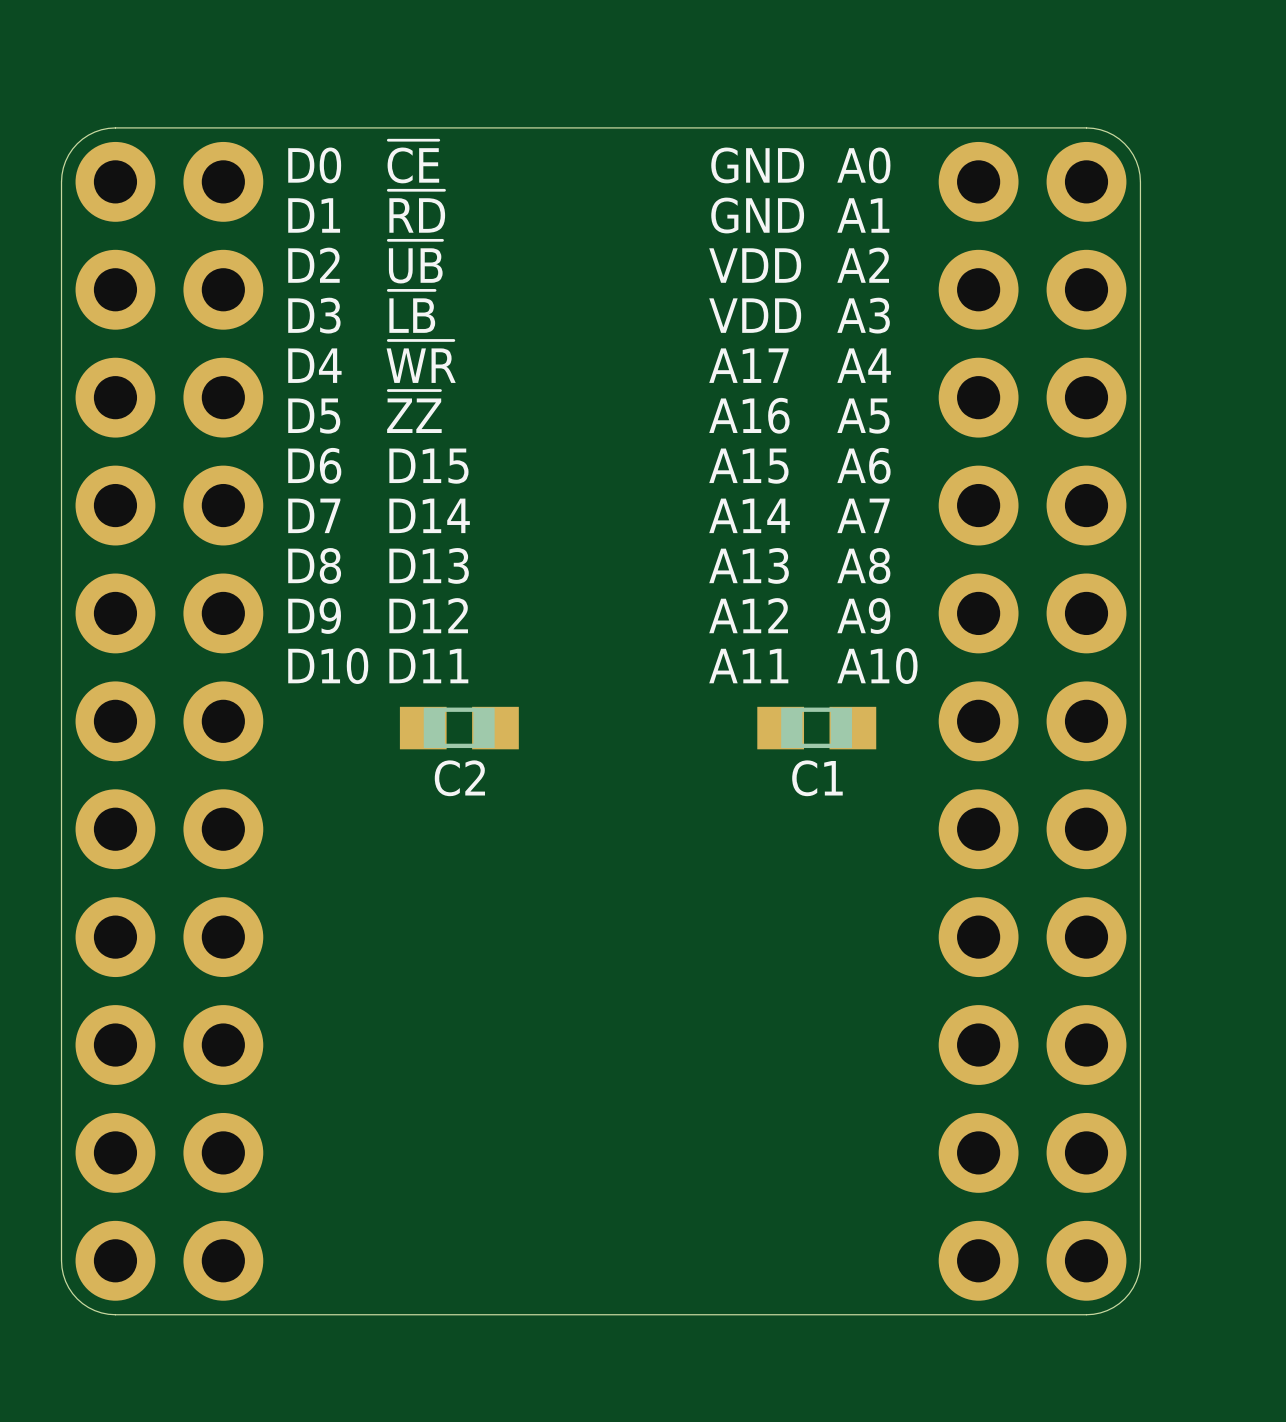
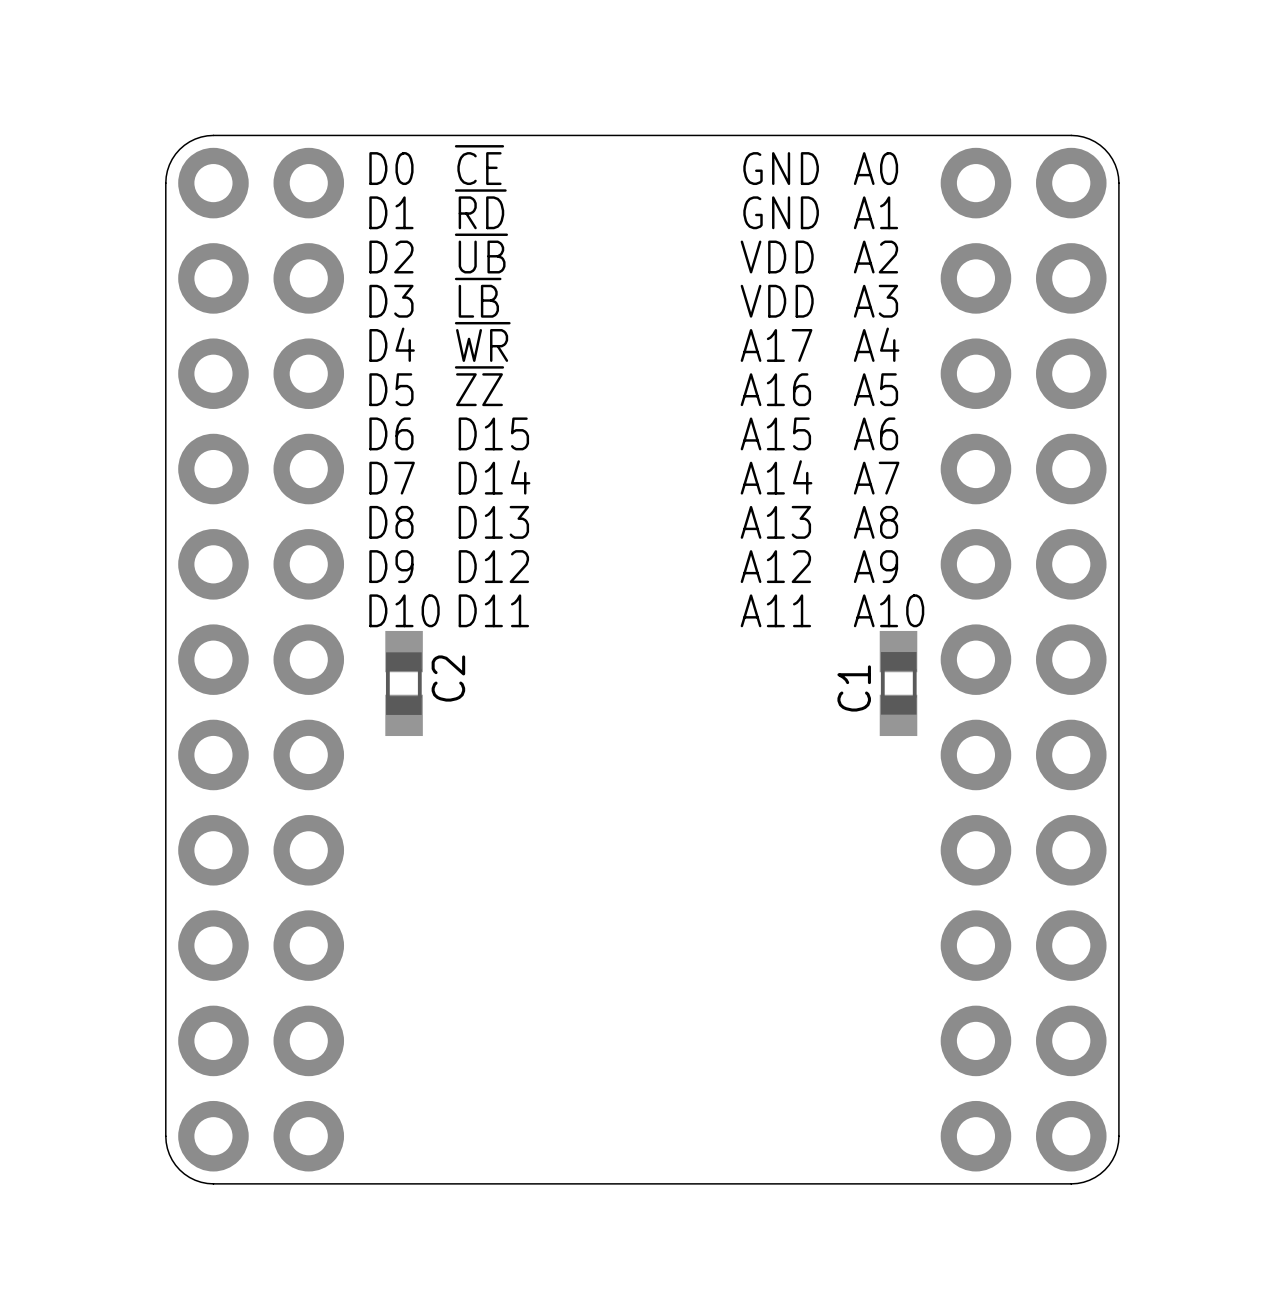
C2 rotation: 0° (459, 728) -> 90° clockwise (404, 683)
C2 position: (459, 728) -> (404, 683)
C1 rotation: 0° (816, 728) -> 90° clockwise (898, 683)
C1 position: (816, 728) -> (898, 683)

